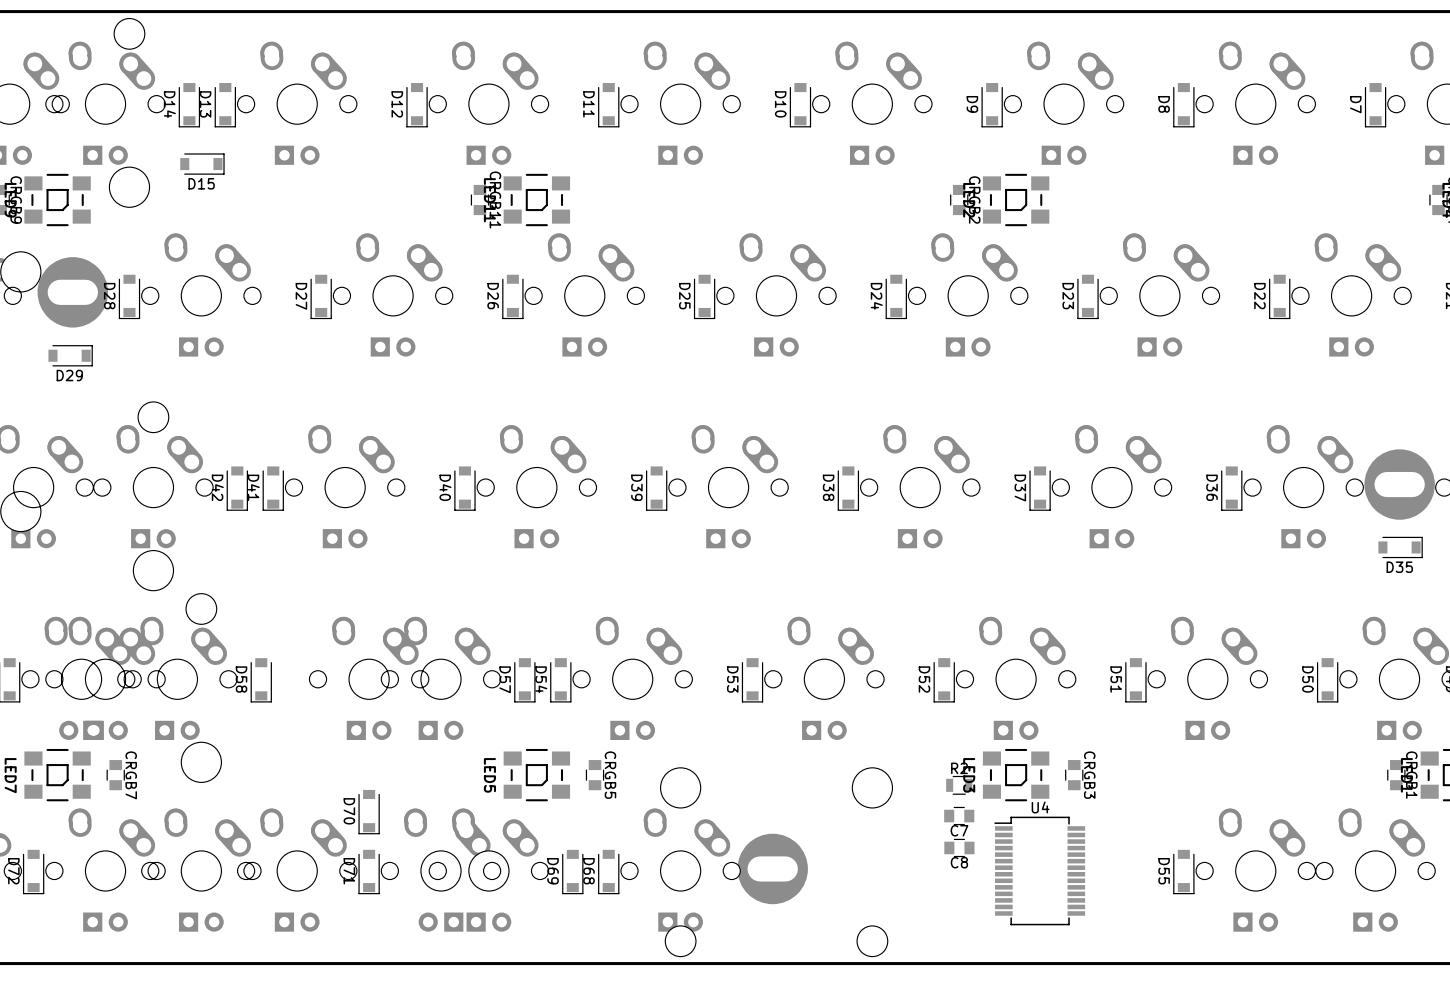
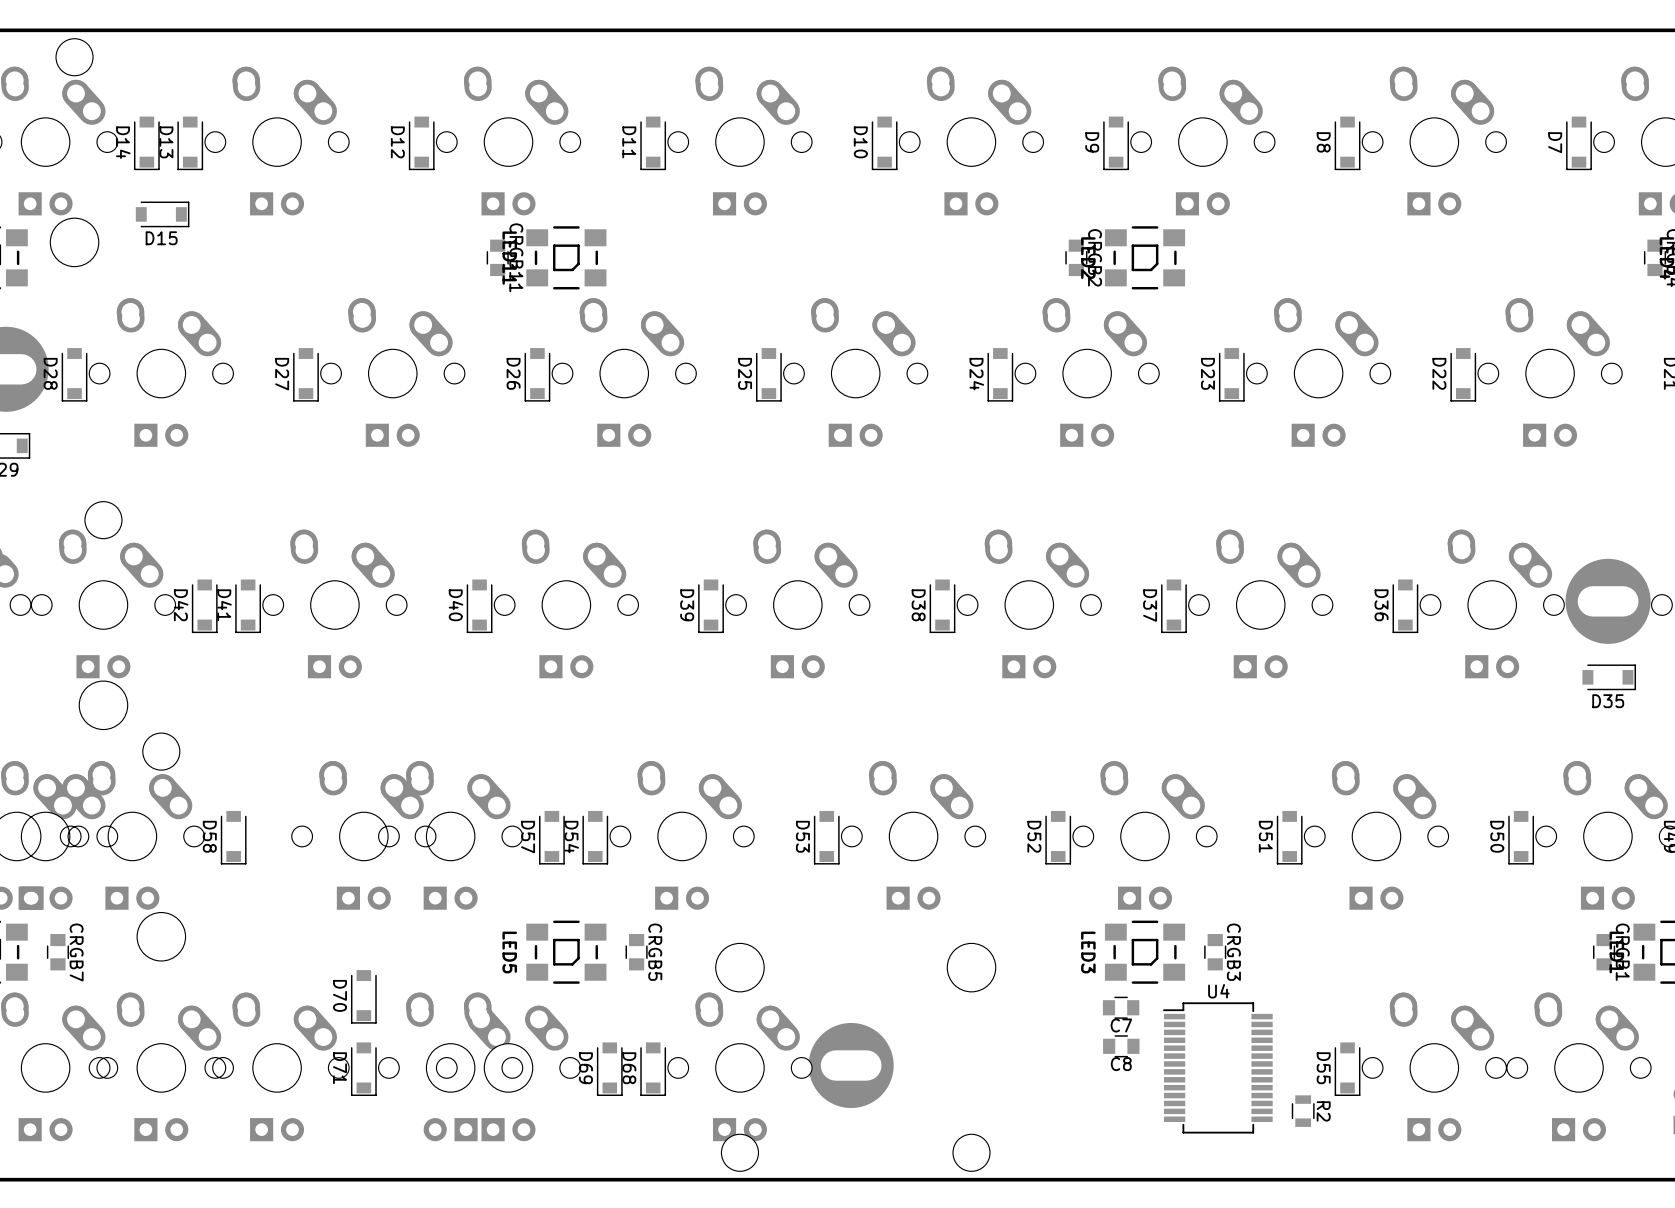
R2 rotation: 0° (959, 785) -> 90° clockwise (1303, 1111)
R2 position: (959, 785) -> (1303, 1111)
C7 position: (959, 816) -> (1121, 1007)
C8 position: (959, 847) -> (1121, 1046)
U4 position: (1039, 870) -> (1217, 1067)

